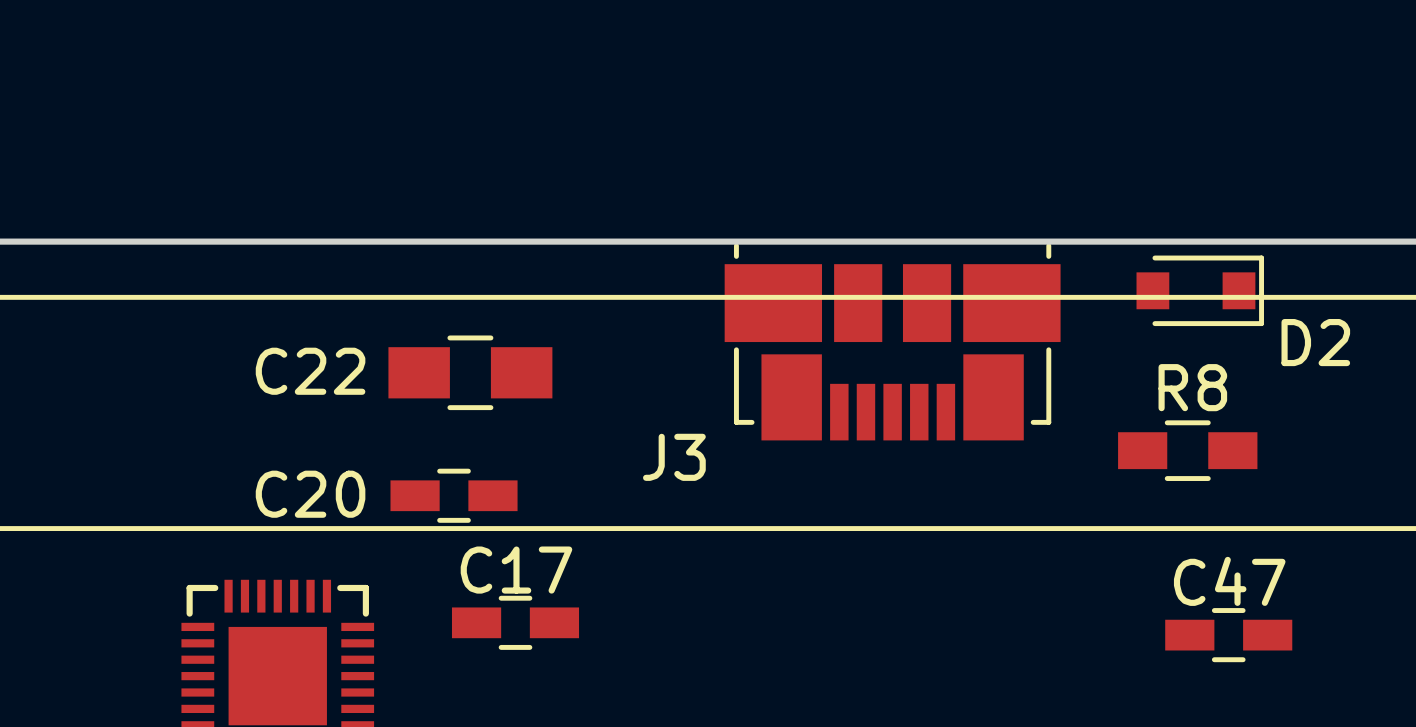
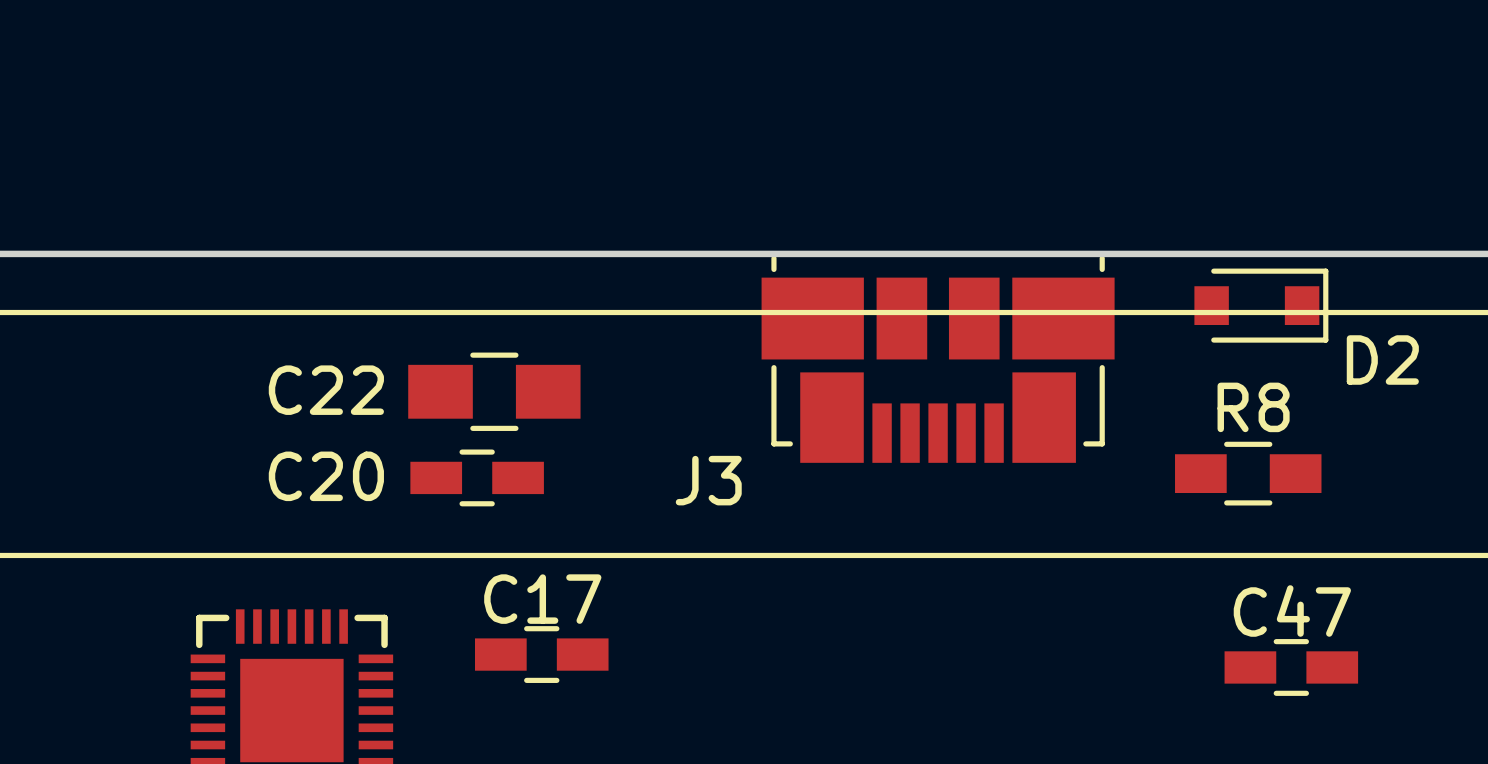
C20 position: (454, 495) -> (477, 477)

